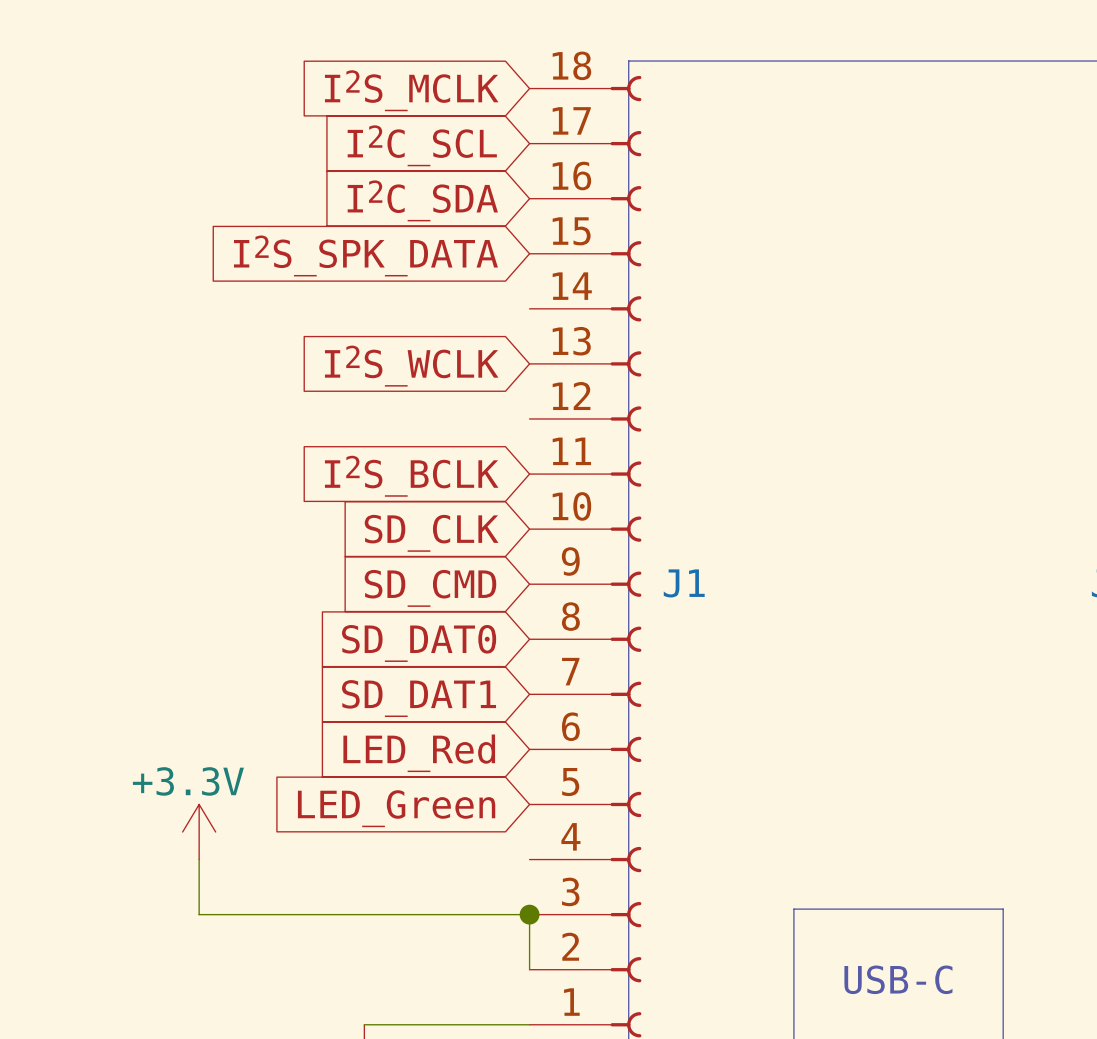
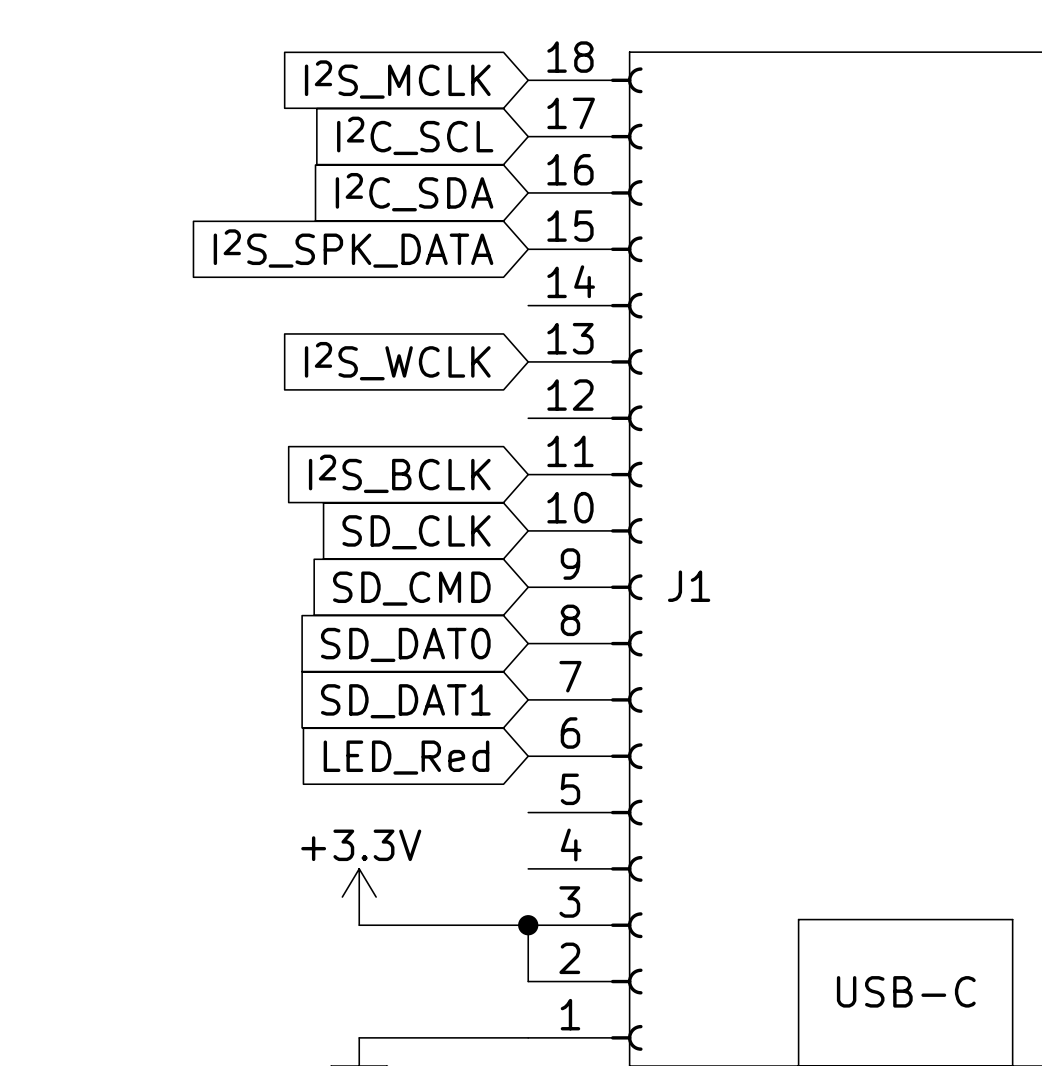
power symbol text position: +3.3V (188, 781) -> +3.3V (361, 845)
global label: LED_Green (396, 808) -> none
power symbol position: +3.3V (199, 832) -> +3.3V (359, 897)
wire: (199, 859) (199, 914) (364, 914) -> none

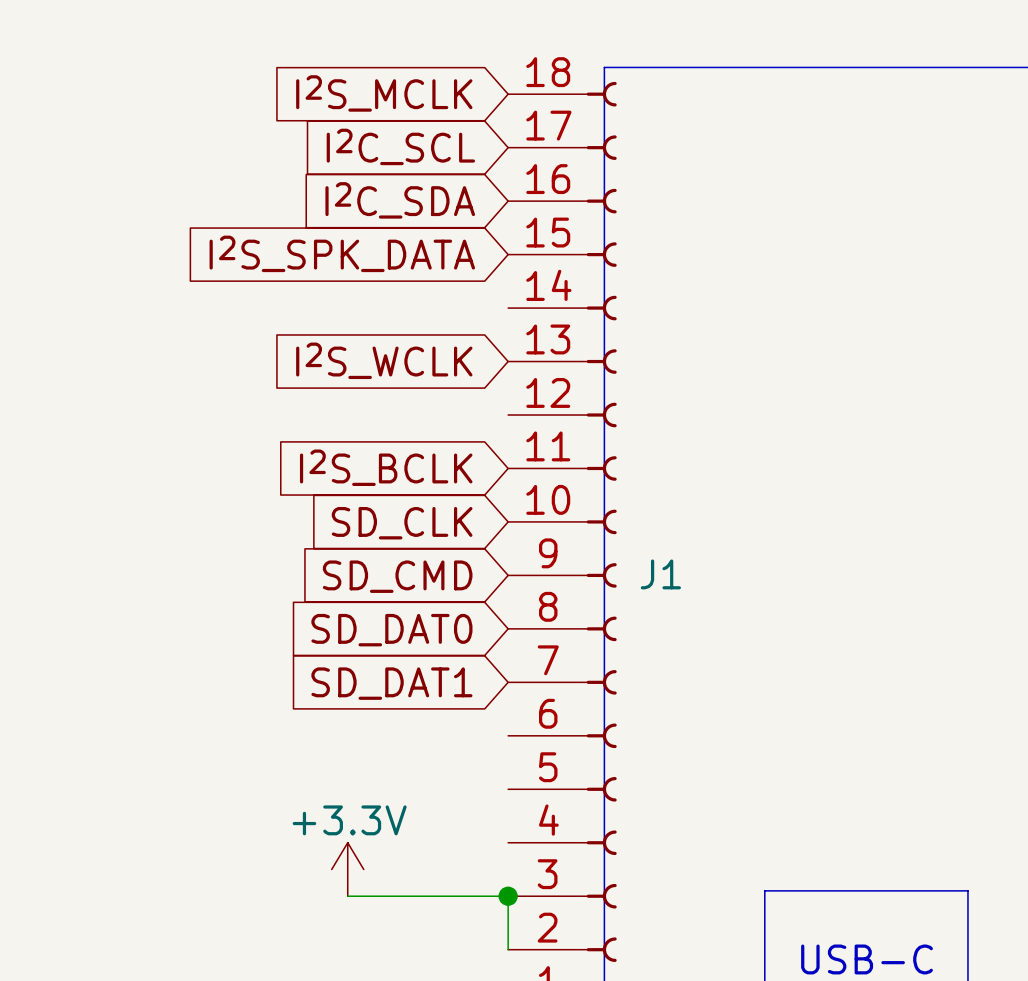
global label: LED_Red (406, 757) -> none

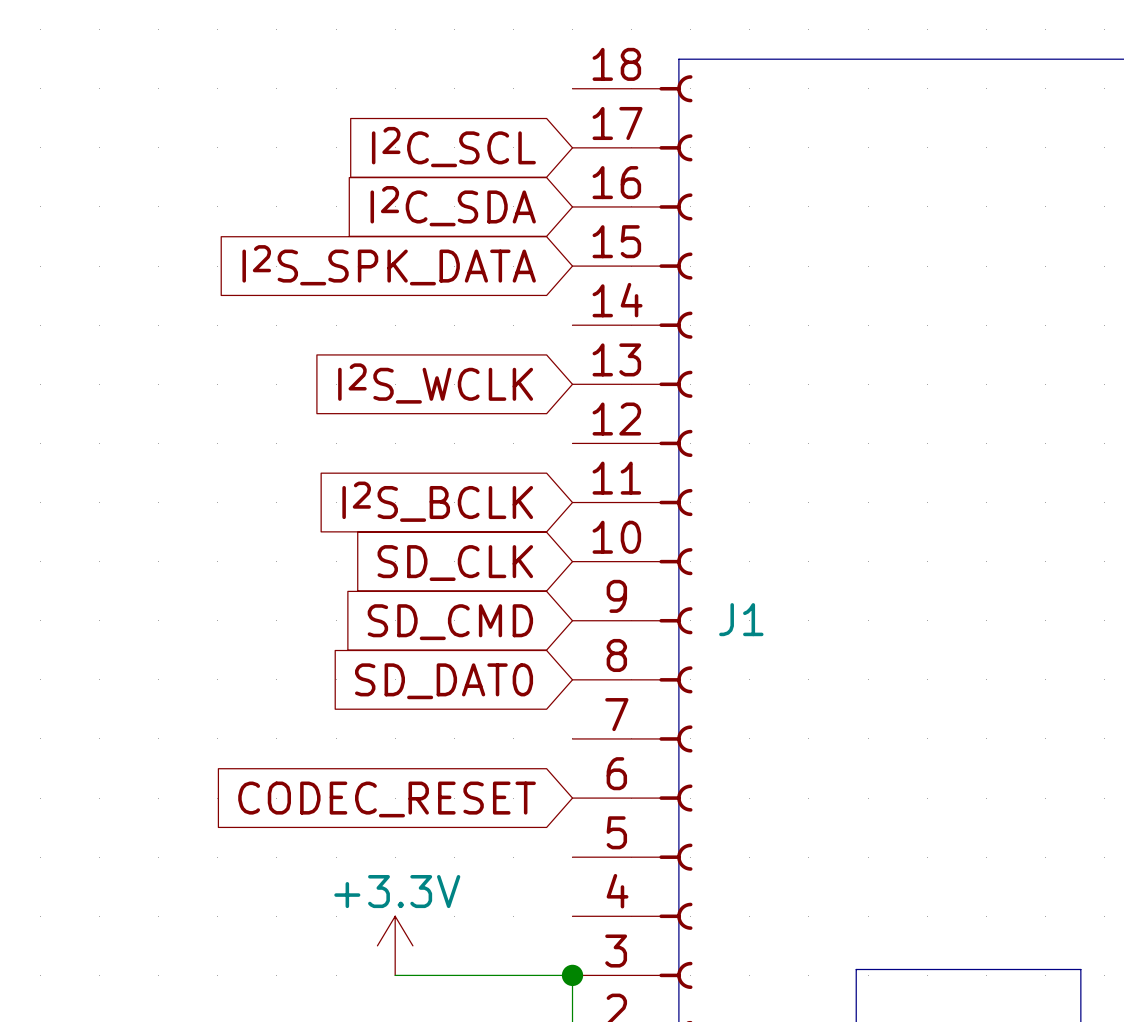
global label: I2S_MCLK (384, 93) -> none
global label: SD_DAT1 (391, 683) -> none
global label: none -> CODEC_RESET (387, 799)

